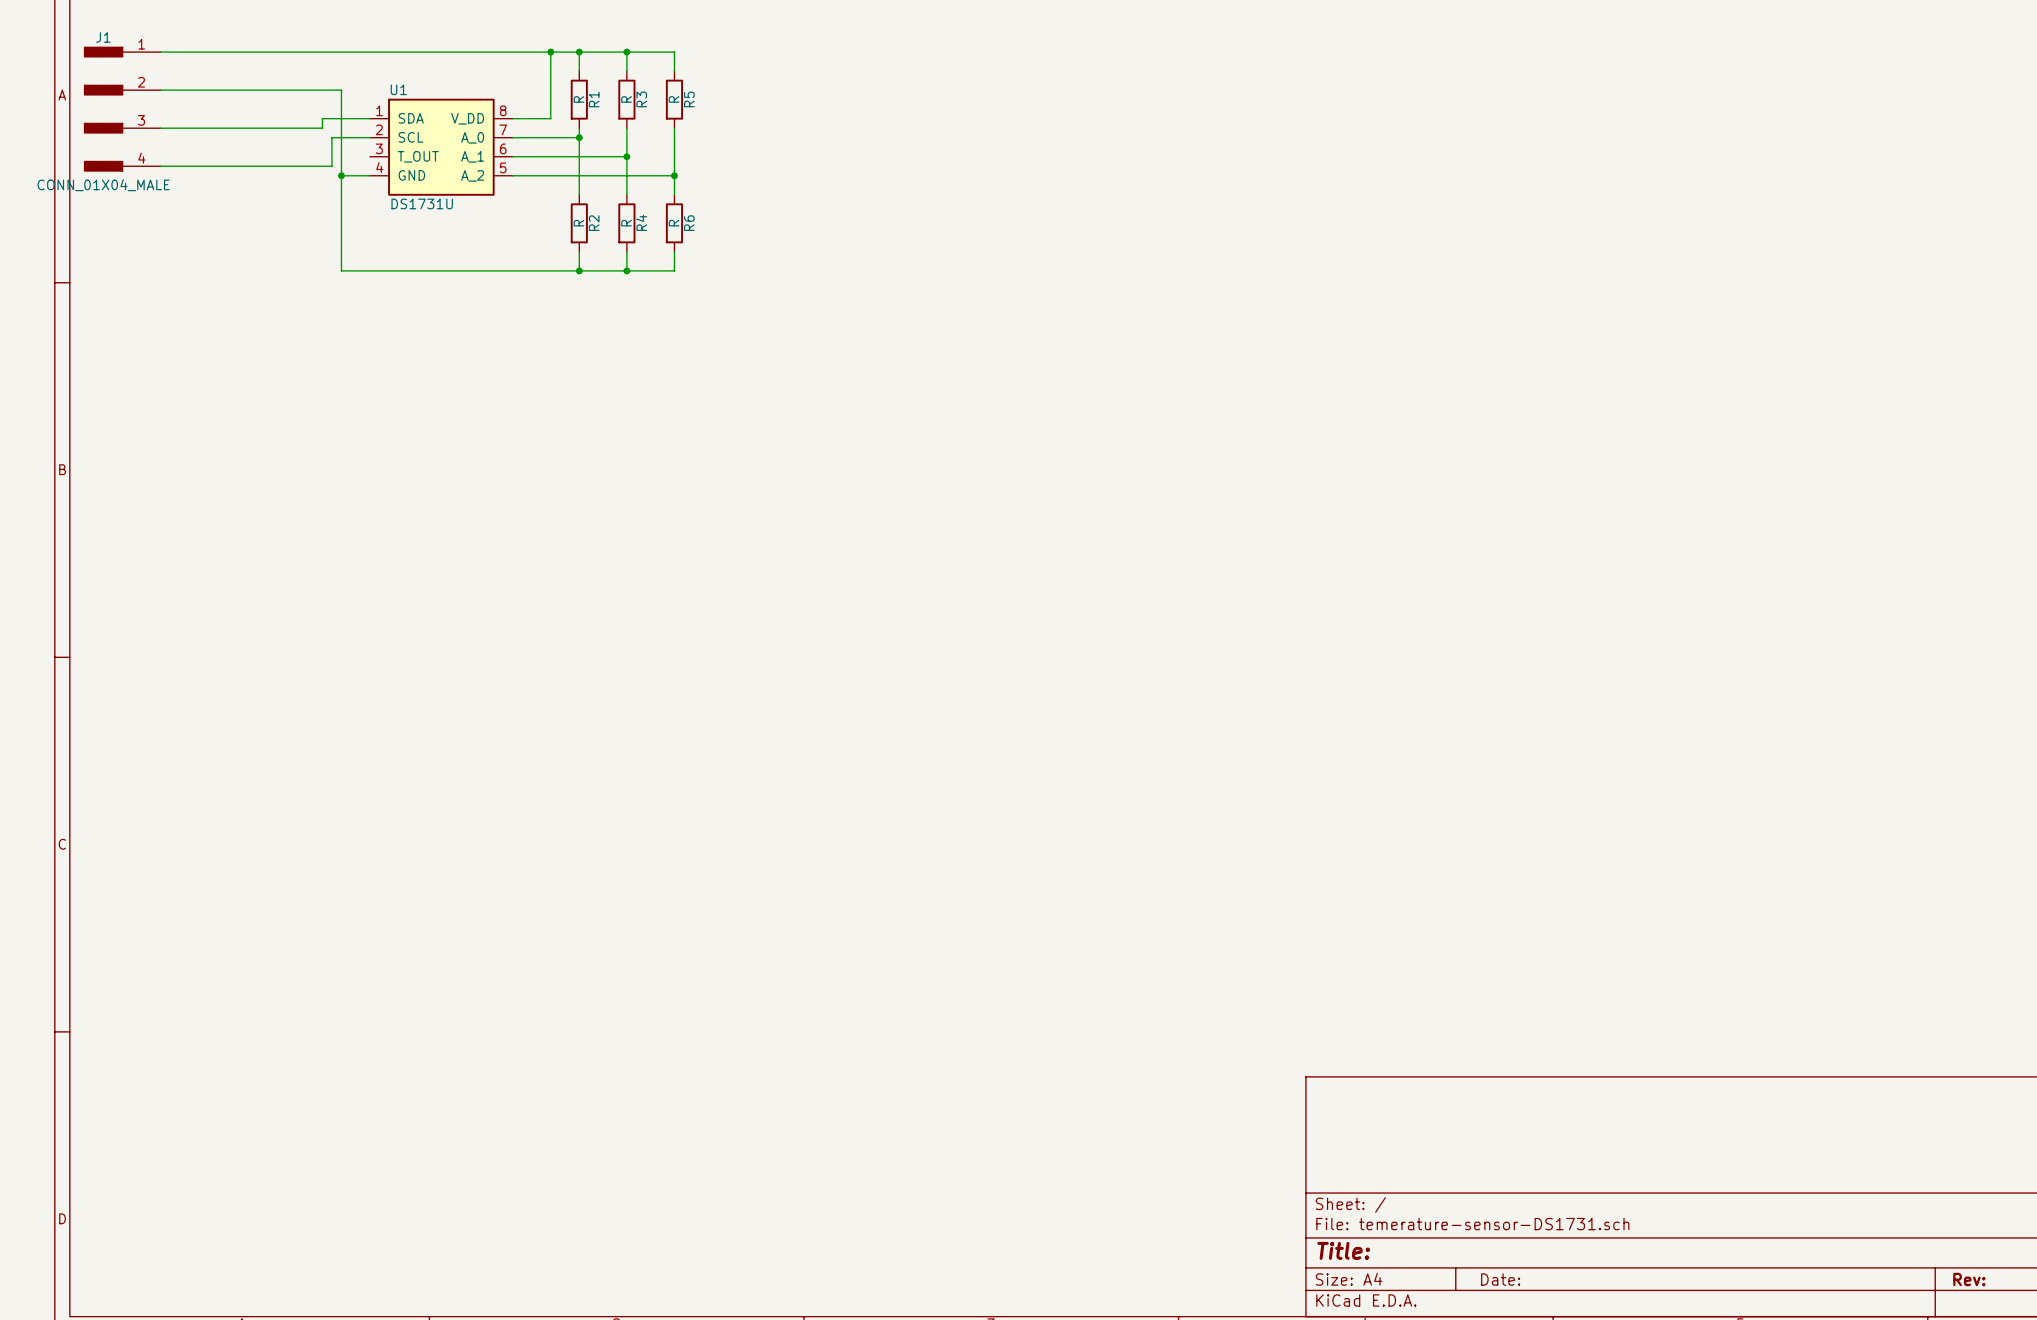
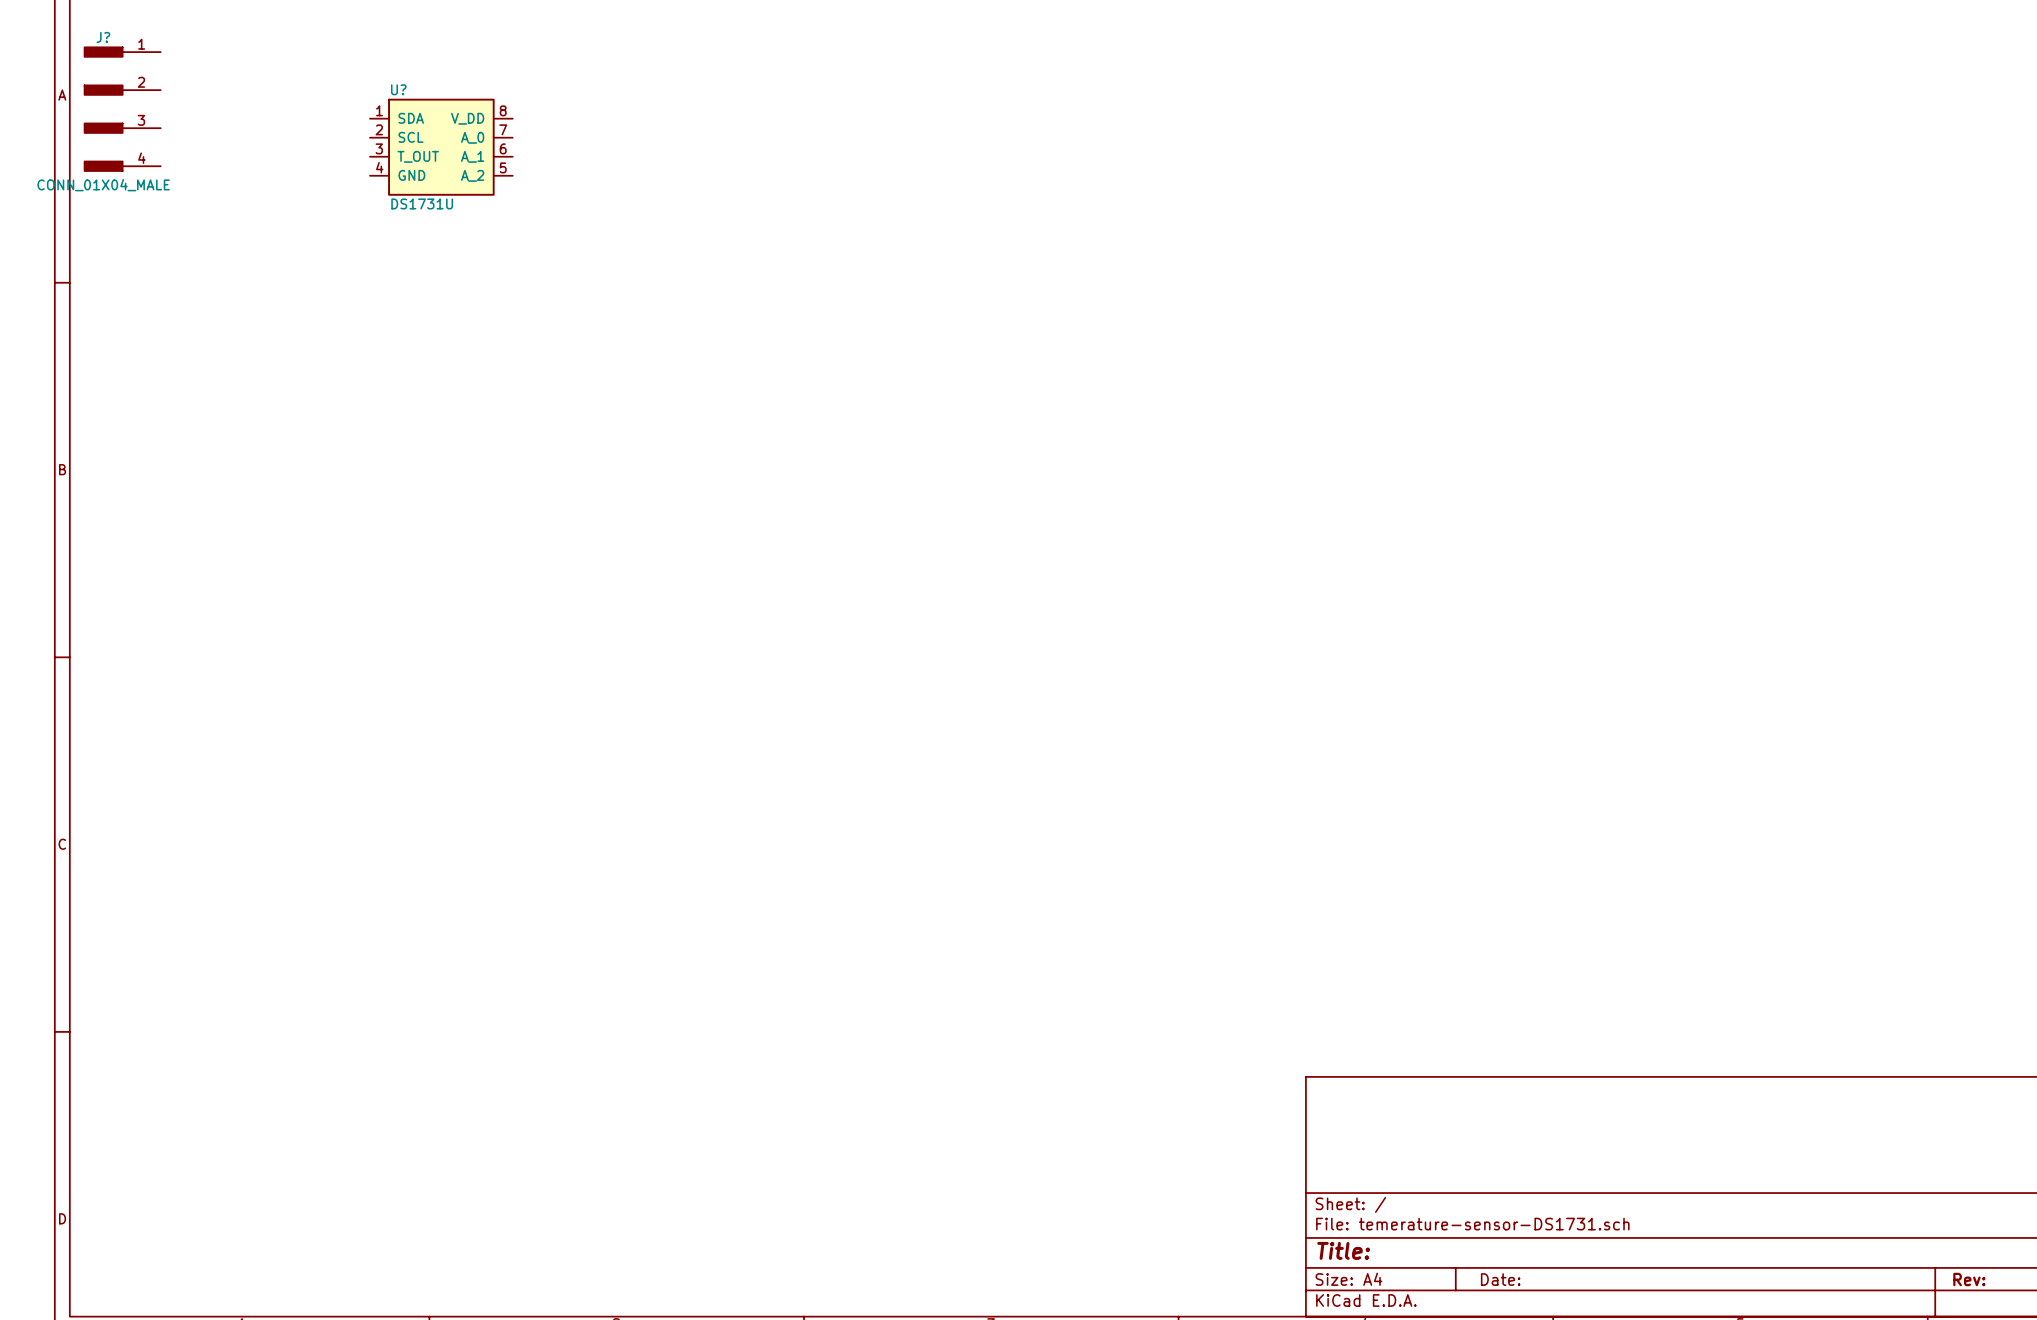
J1 name: J1 (103, 37) -> J? (103, 37)
wire: (160, 52) (674, 52) (674, 71) -> none
wire: (550, 52) (550, 118) (512, 118) -> none
junction: (550, 52) -> none
wire: (579, 52) (579, 71) -> none
junction: (579, 52) -> none
wire: (626, 52) (626, 71) -> none
junction: (626, 52) -> none
U1 name: U1 (398, 89) -> U? (398, 89)
wire: (160, 90) (341, 90) (341, 270) (674, 270) (674, 251) -> none
R1: R (579, 99) -> none
R3: R (626, 99) -> none
R5: R (674, 99) -> none
wire: (370, 118) (322, 118) (322, 128) (160, 128) -> none
wire: (579, 128) (579, 194) -> none
wire: (626, 128) (626, 194) -> none
wire: (674, 128) (674, 194) -> none
wire: (370, 137) (331, 137) (331, 166) (160, 166) -> none
wire: (512, 137) (579, 137) -> none
junction: (579, 137) -> none
wire: (512, 156) (626, 156) -> none
junction: (626, 156) -> none
wire: (341, 175) (370, 175) -> none
junction: (341, 175) -> none
wire: (512, 175) (674, 175) -> none
junction: (674, 175) -> none
R2: R (579, 223) -> none
R4: R (626, 223) -> none
R6: R (674, 223) -> none
wire: (579, 251) (579, 270) -> none
wire: (626, 251) (626, 270) -> none
junction: (579, 270) -> none
junction: (626, 270) -> none

